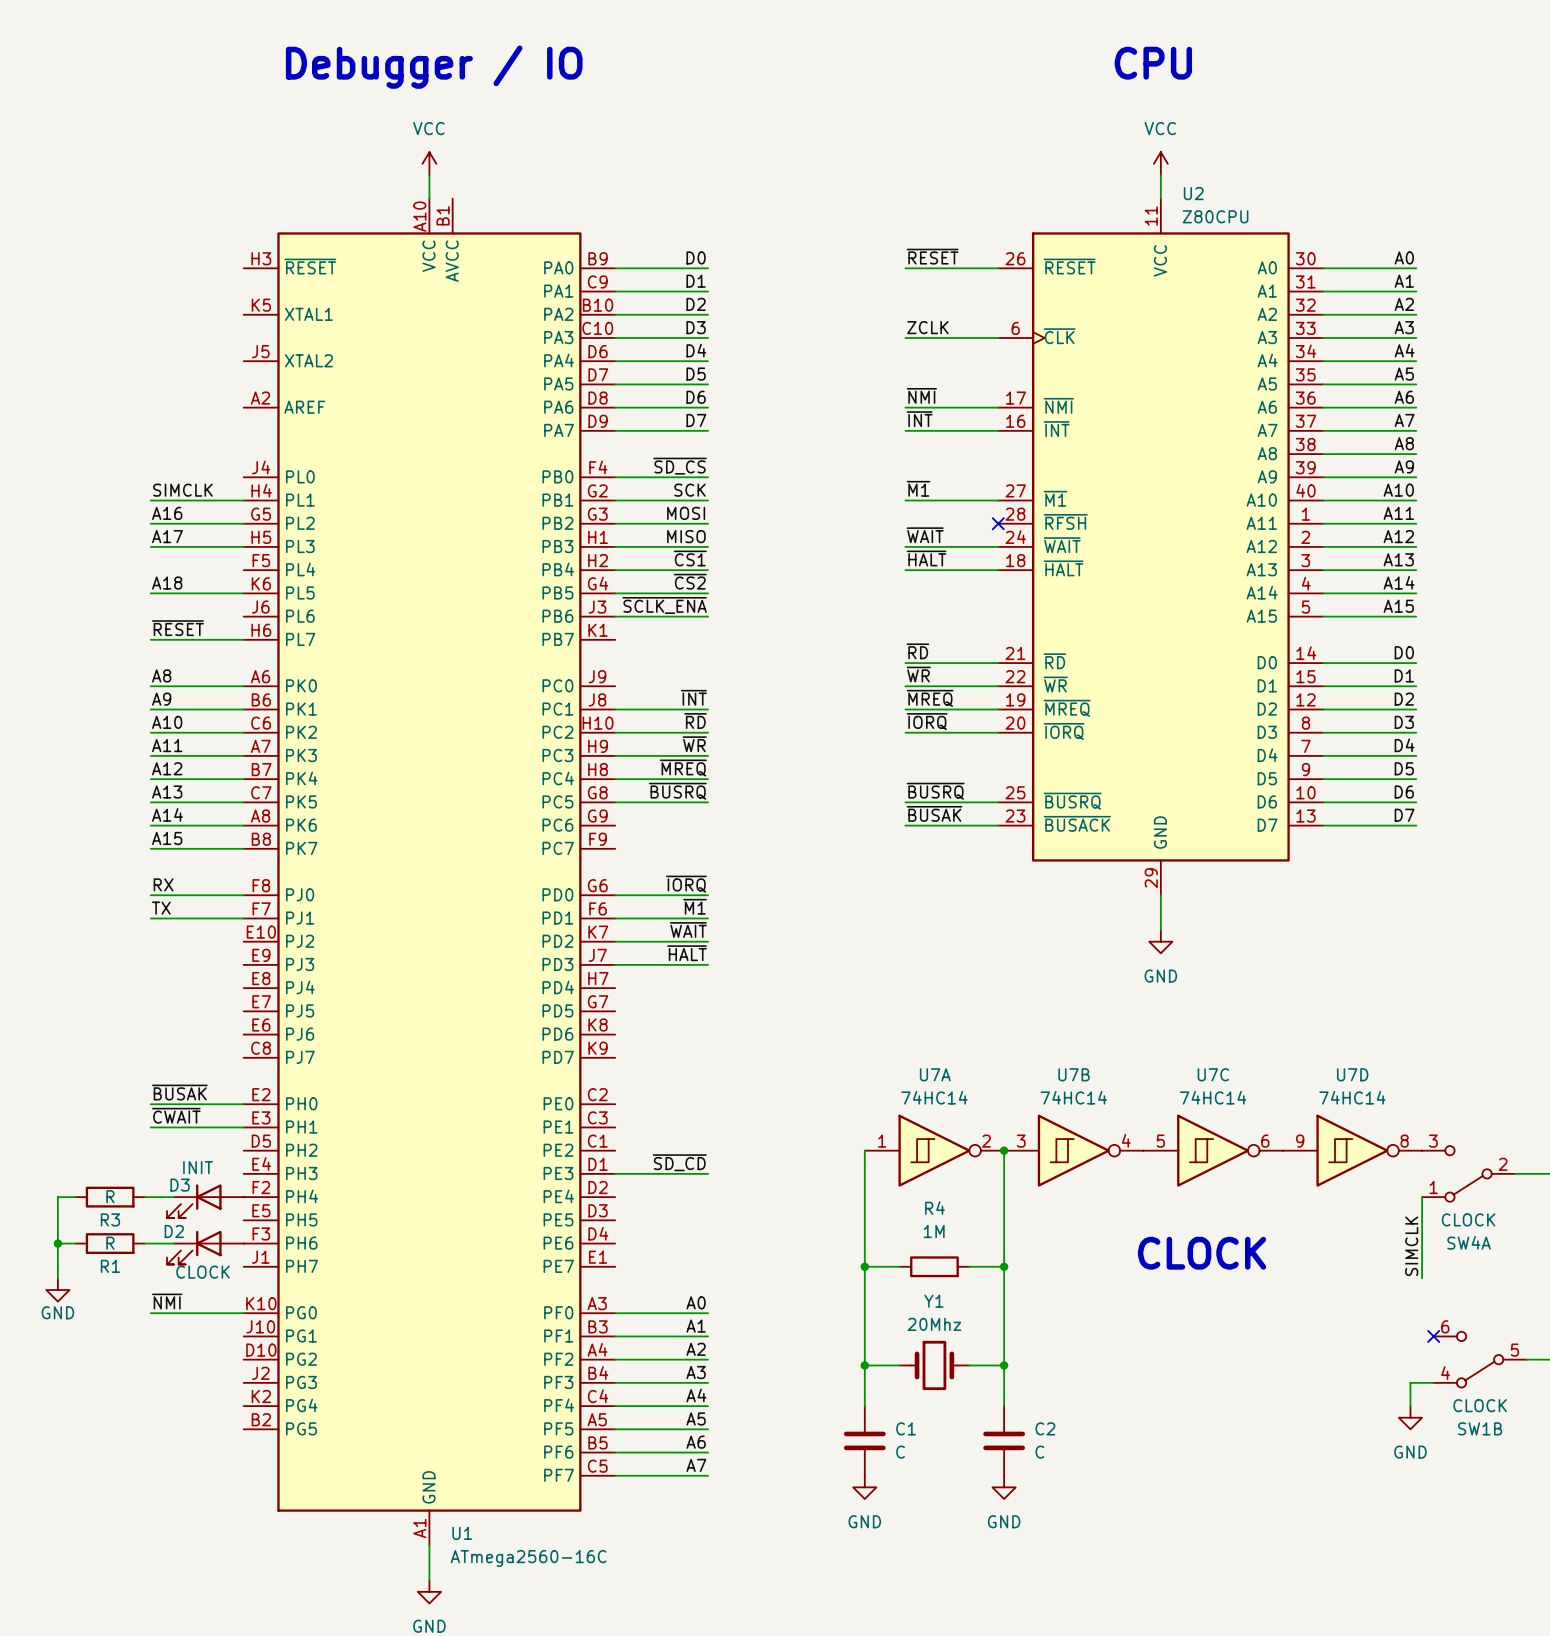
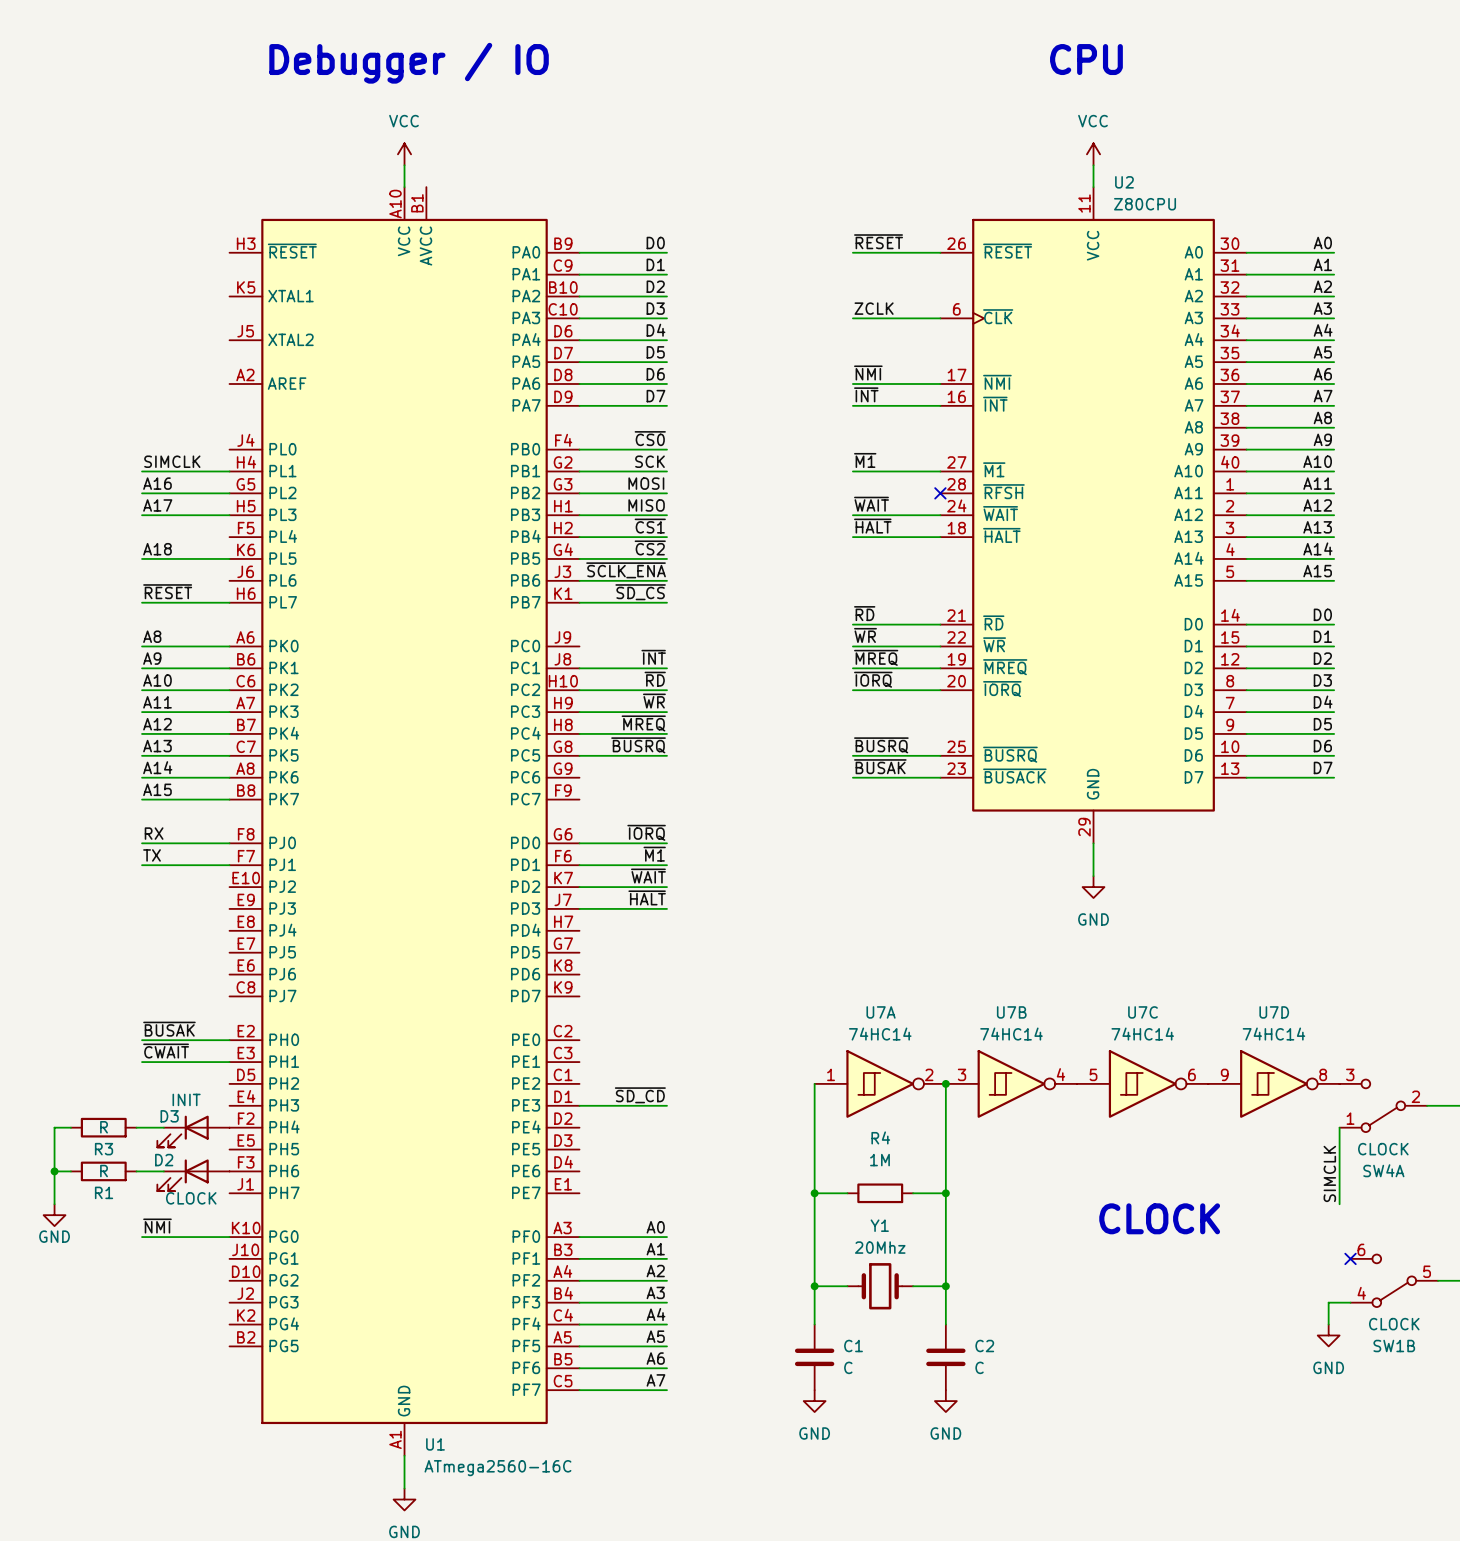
label: ~{SD_CS} (680, 466) -> ~{CS0} (650, 438)
label: none -> ~{SD_CS} (640, 592)
wire: none -> (579, 602) (666, 602)
text position: CLOCK (1202, 1253) -> CLOCK (1159, 1218)

